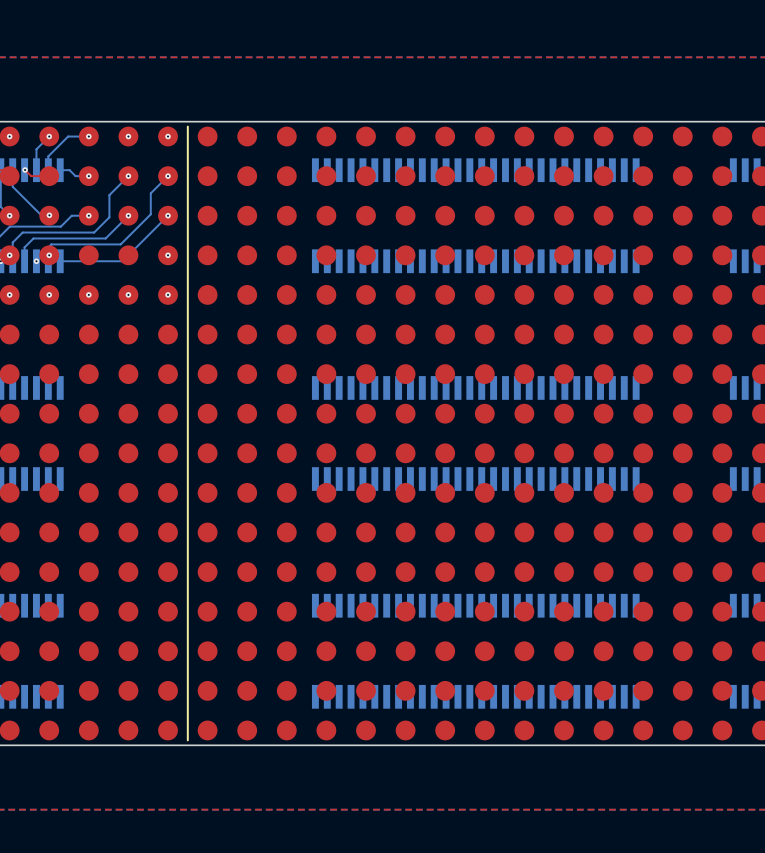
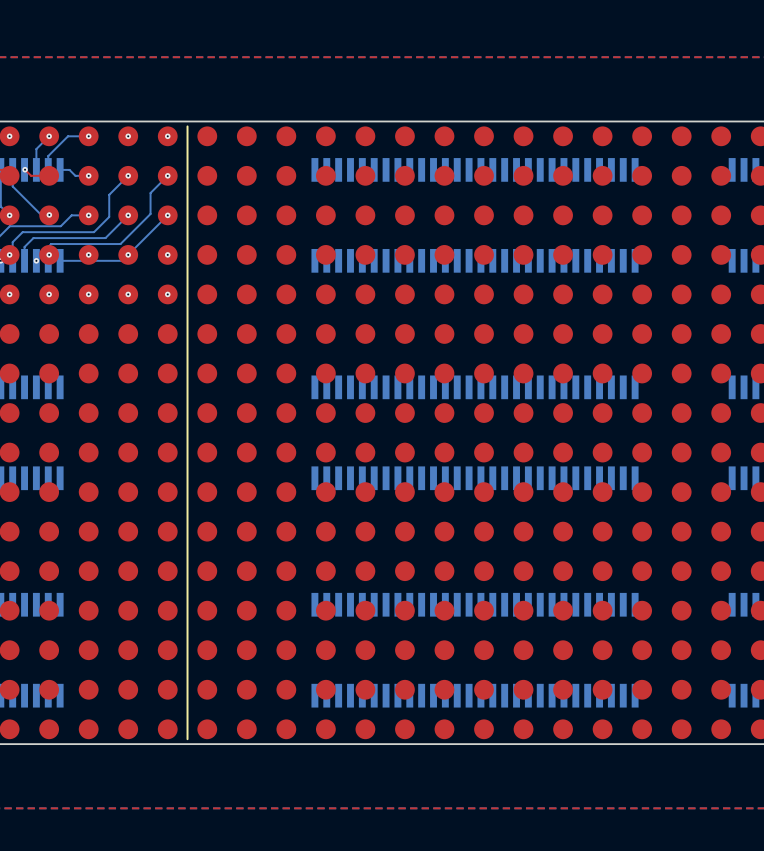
via: none -> (88, 254)
via: none -> (128, 254)

